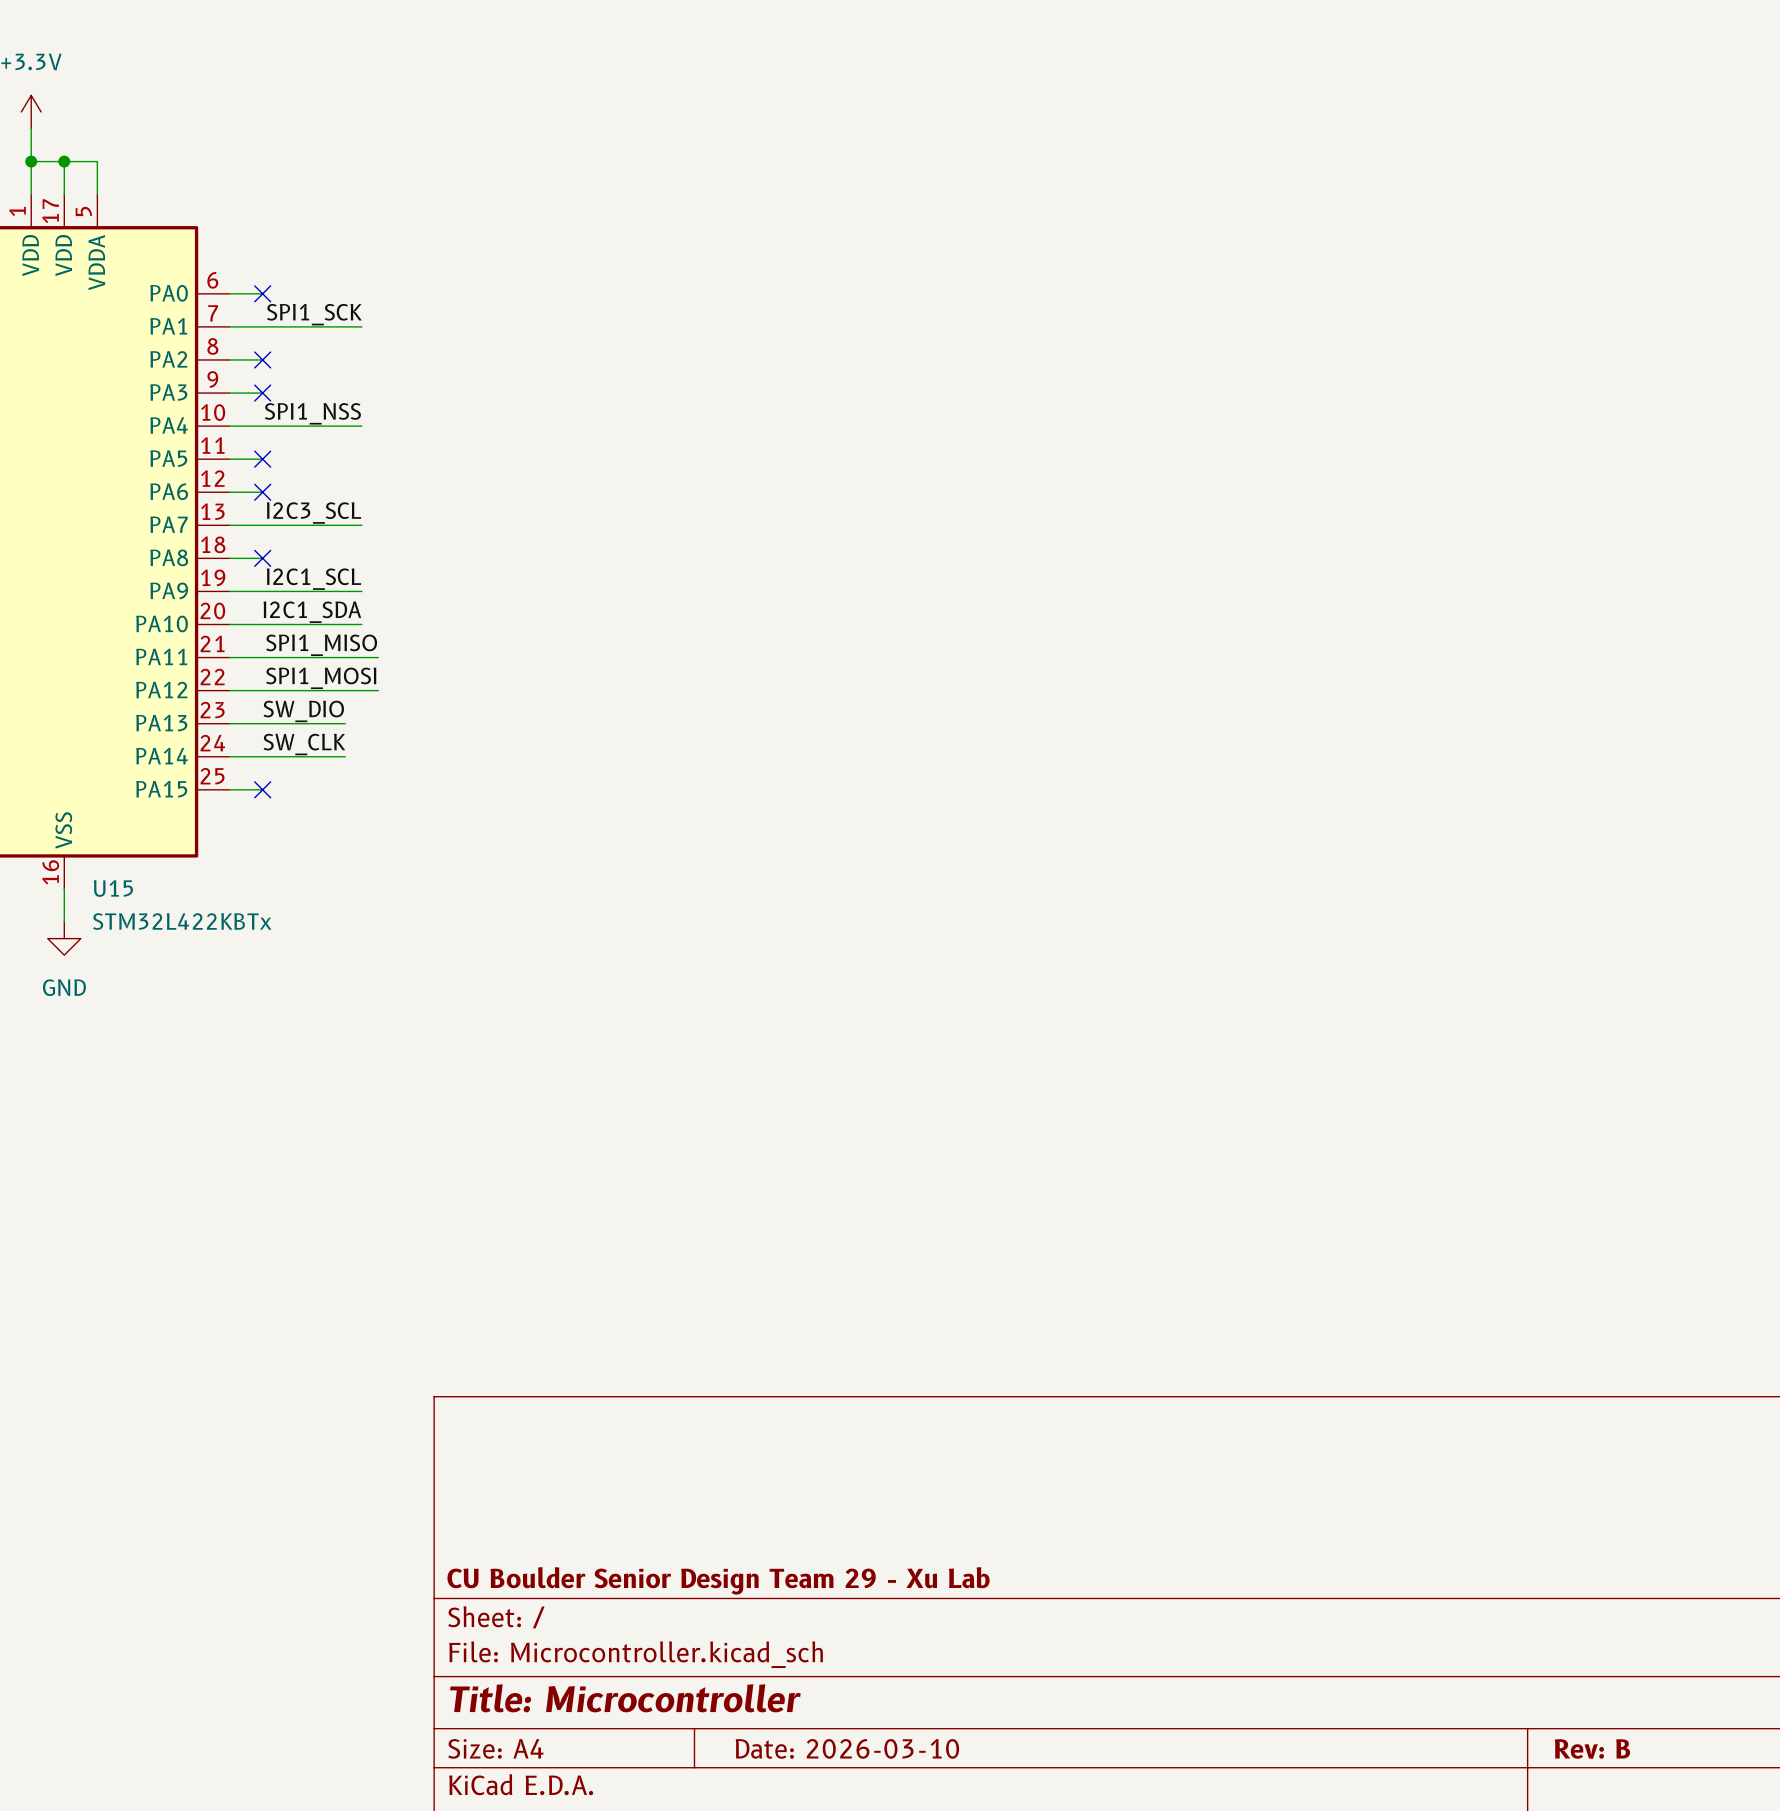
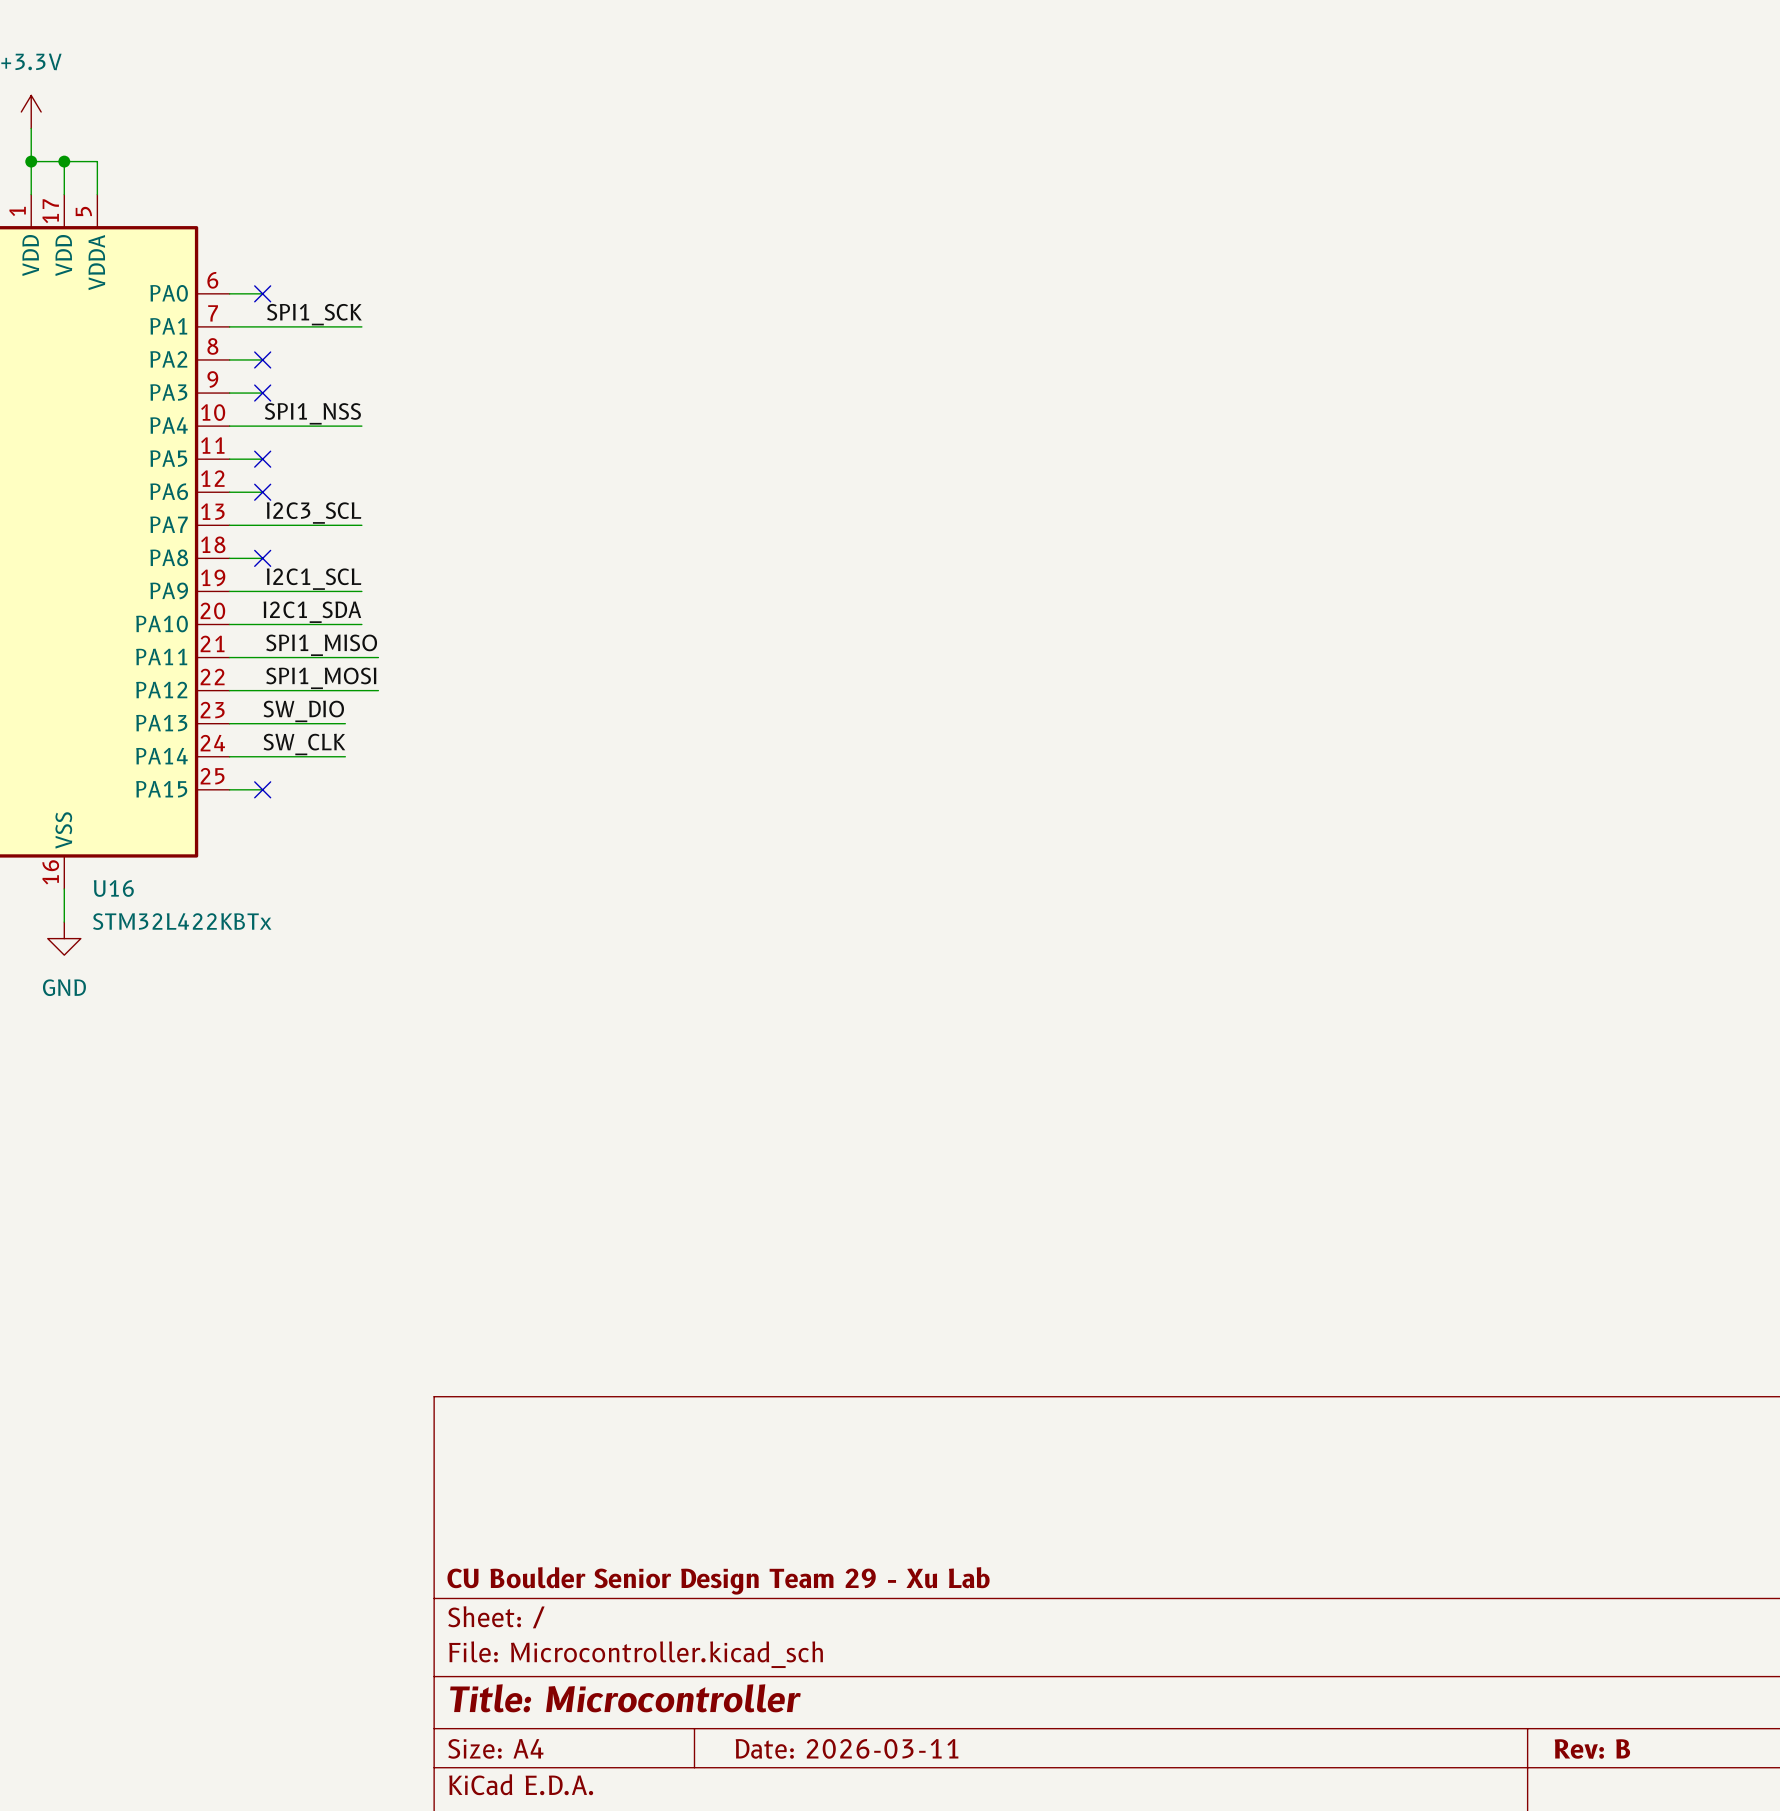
U15 name: U15 (113, 888) -> U16 (113, 888)
title block: Date: 2026-03-10 (847, 1748) -> Date: 2026-03-11 (847, 1748)

